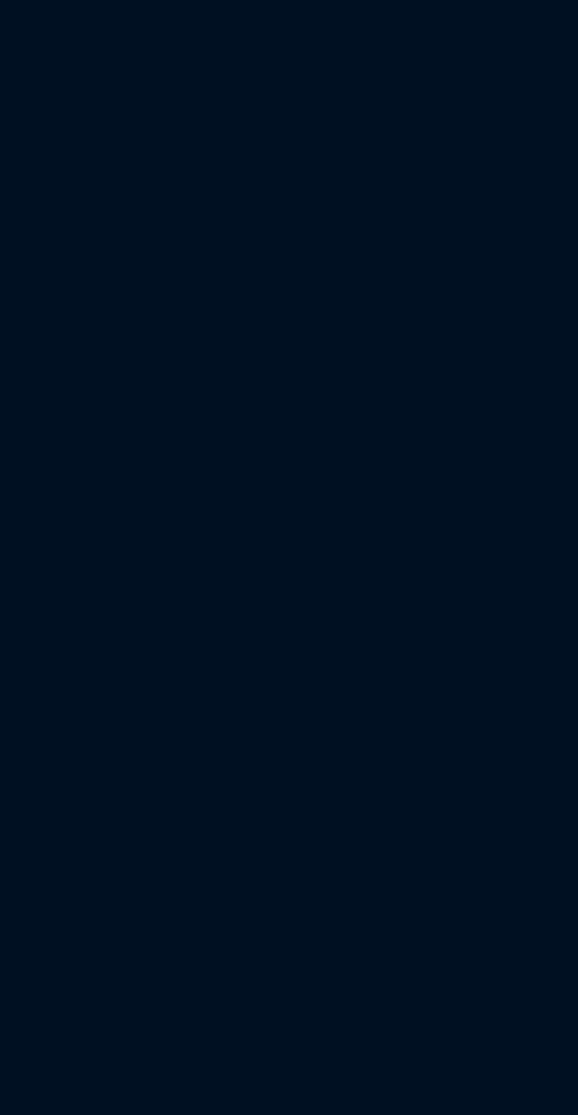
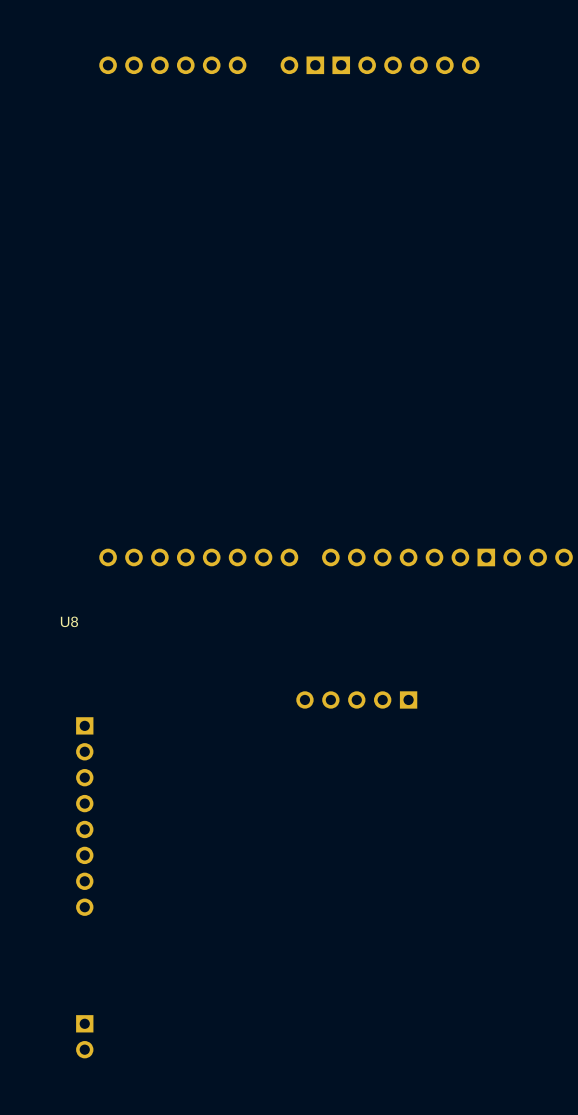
U8: none -> (336, 311)
part: none -> (356, 699)
part: none -> (84, 816)
part: none -> (84, 1036)

